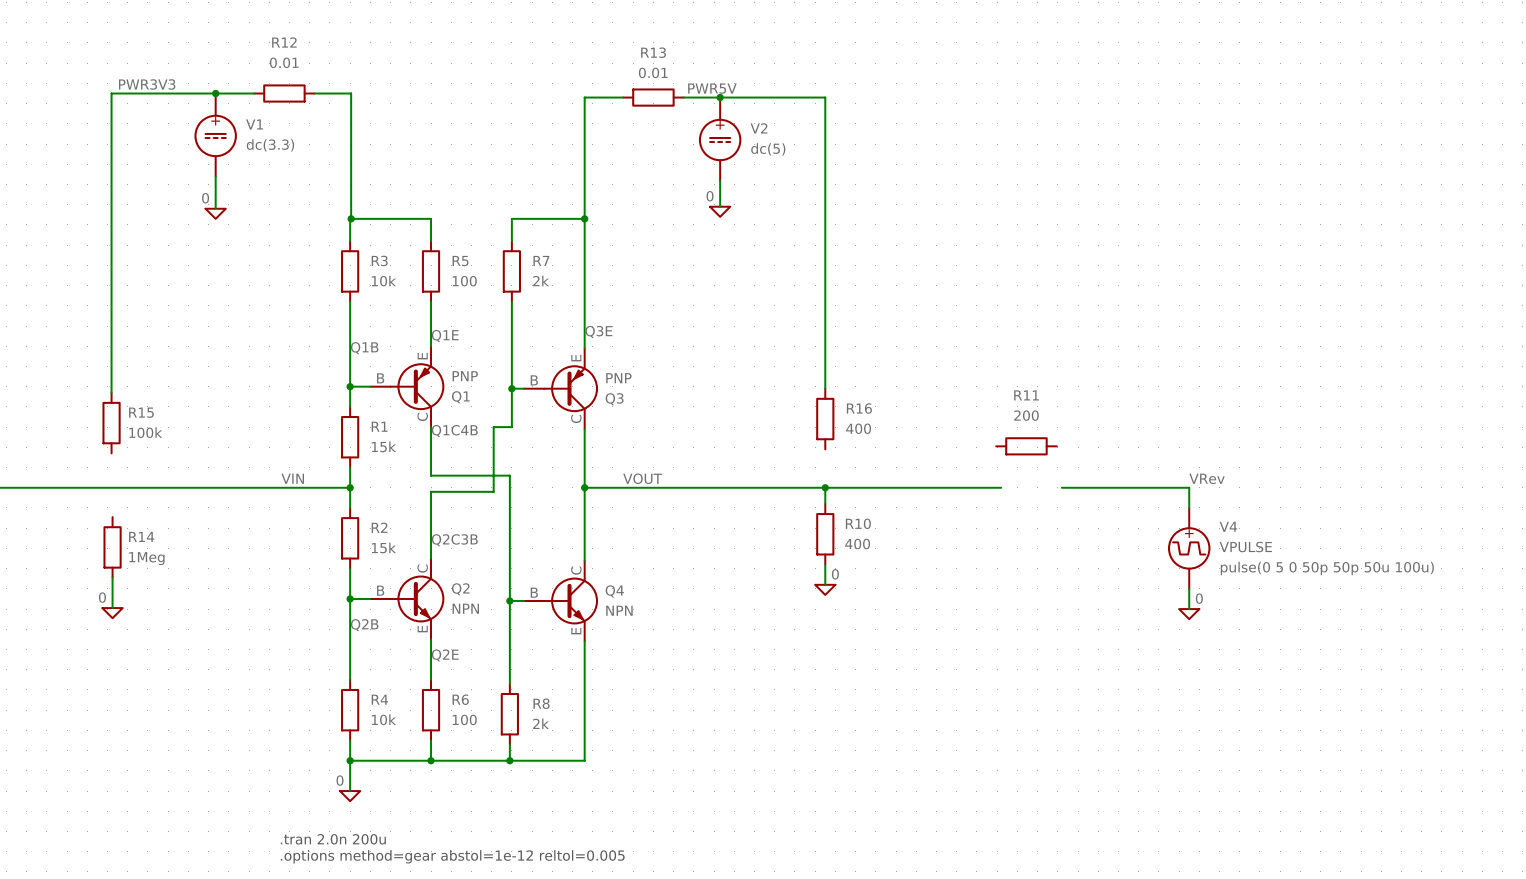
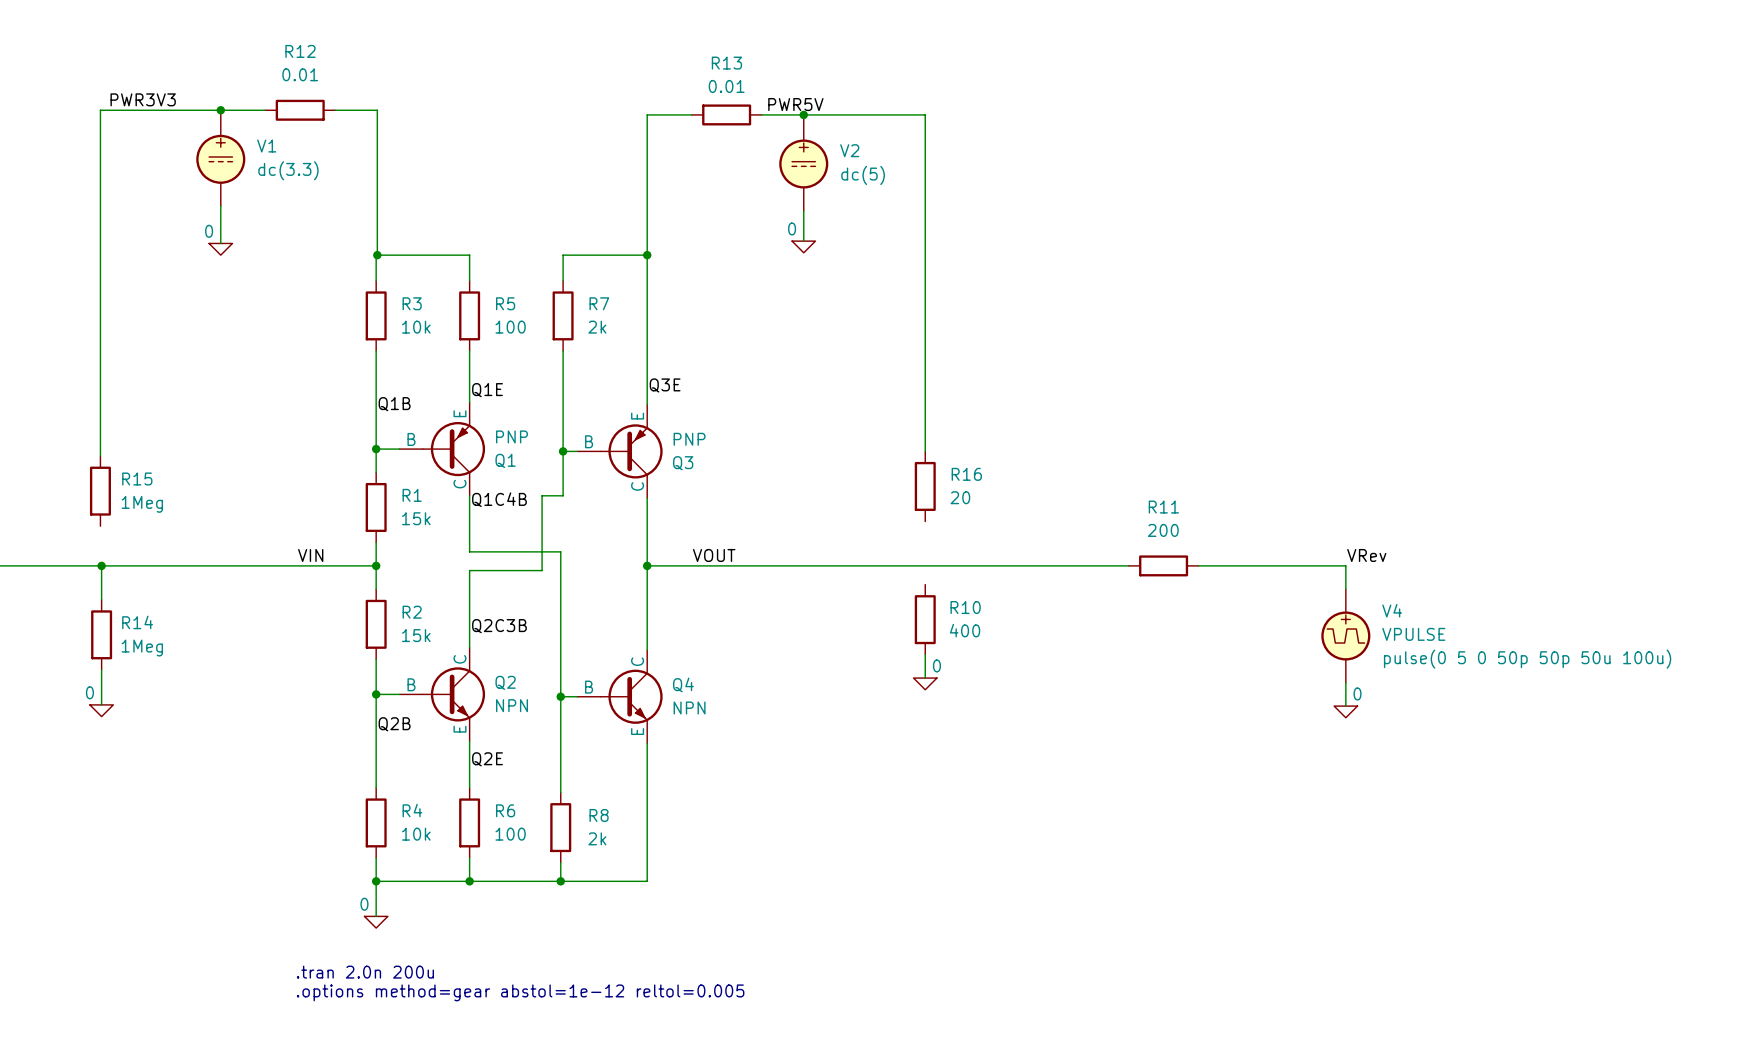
R16 value: 400 (858, 428) -> 20 (960, 497)
R15 value: 100k (145, 432) -> 1Meg (142, 504)
R11 position: (1026, 446) -> (1163, 565)
wire: none -> (101, 565) (101, 599)
junction: none -> (101, 565)
wire: (825, 487) (825, 503) -> none
junction: (825, 487) -> none

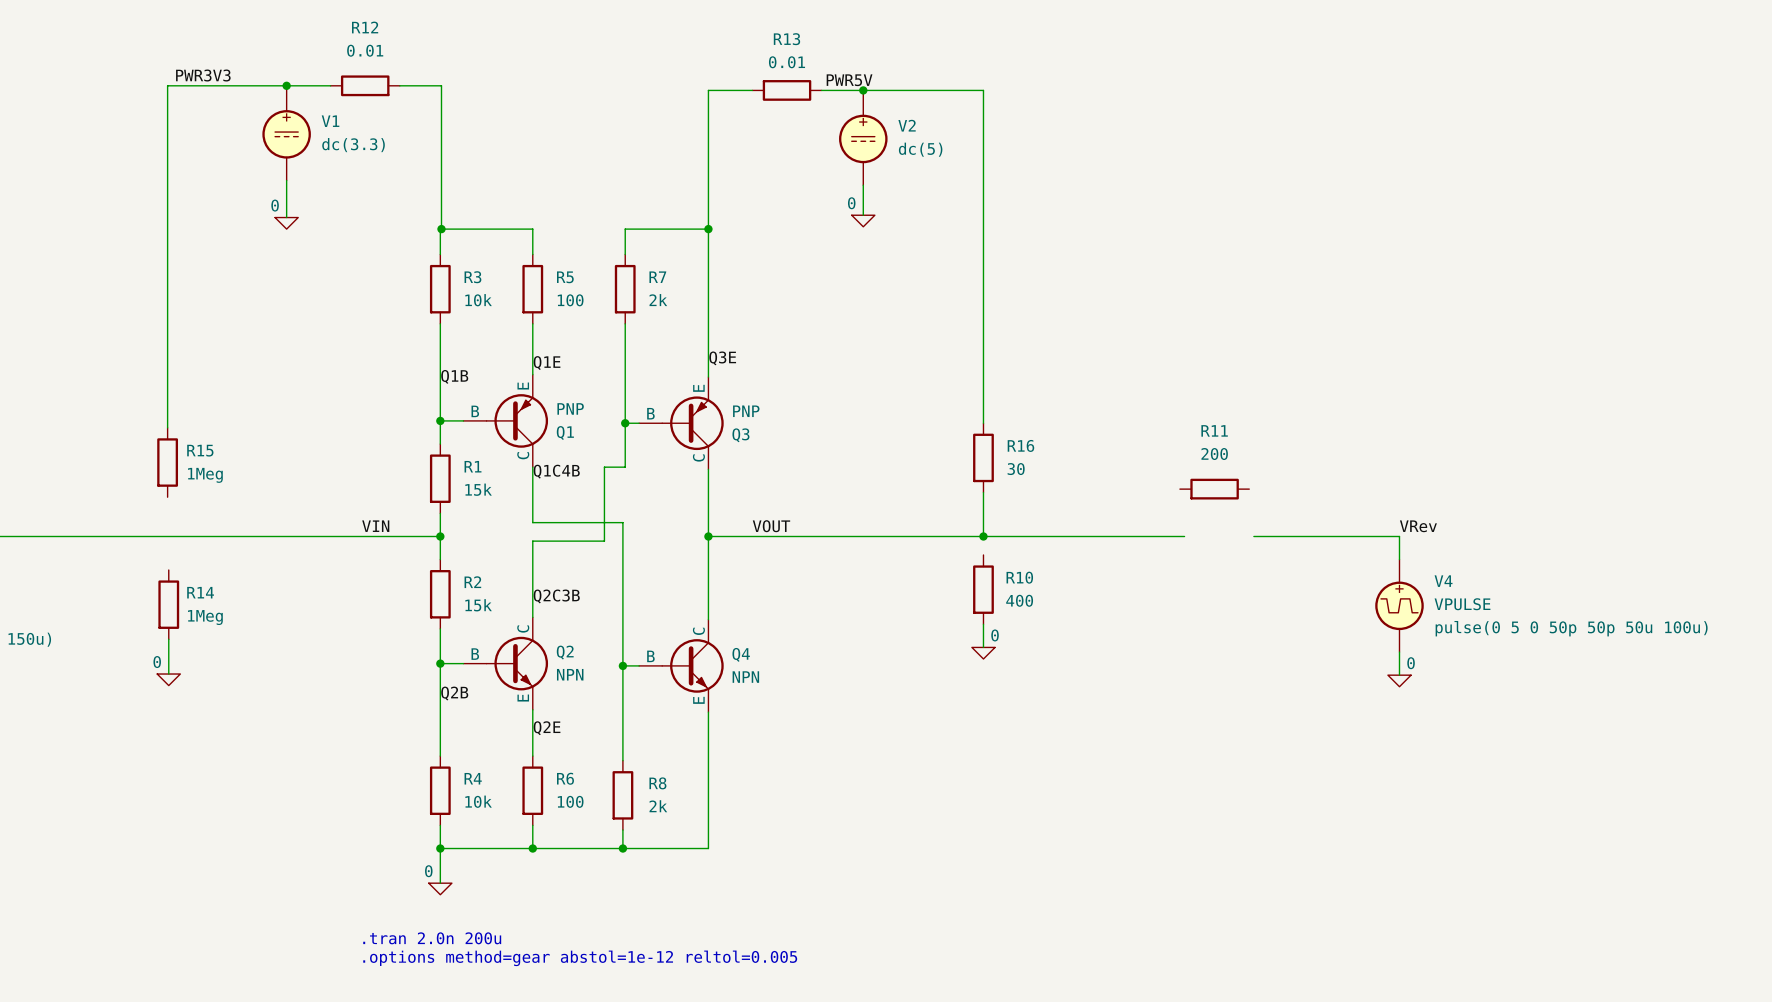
R16 value: 20 (960, 497) -> 30 (1016, 469)
wire: none -> (983, 492) (983, 536)
wire: (101, 565) (101, 599) -> none
junction: (101, 565) -> none
junction: none -> (983, 536)
R11 position: (1163, 565) -> (1214, 489)

